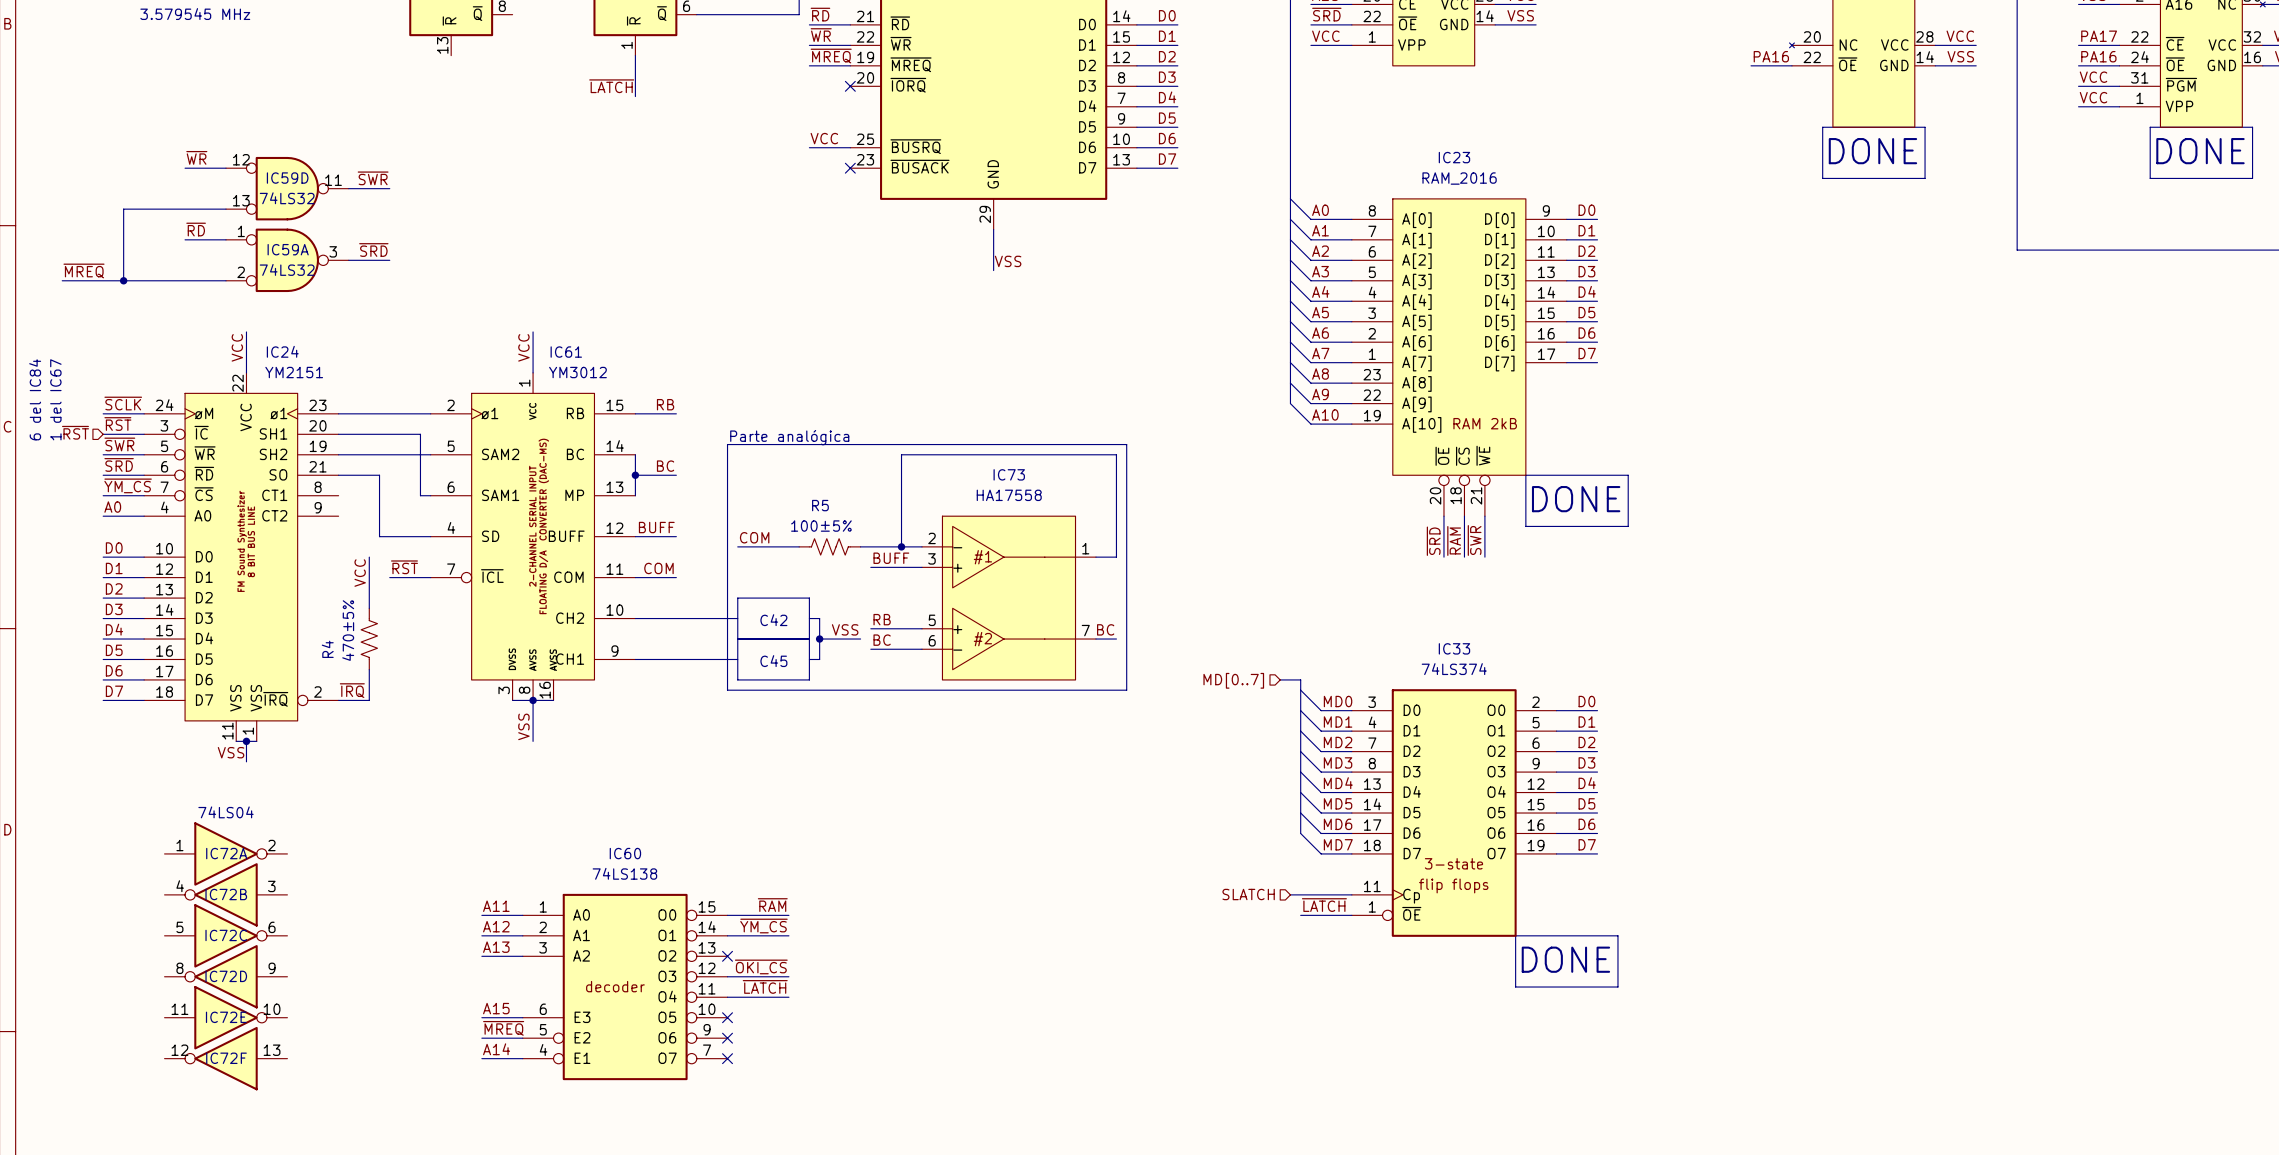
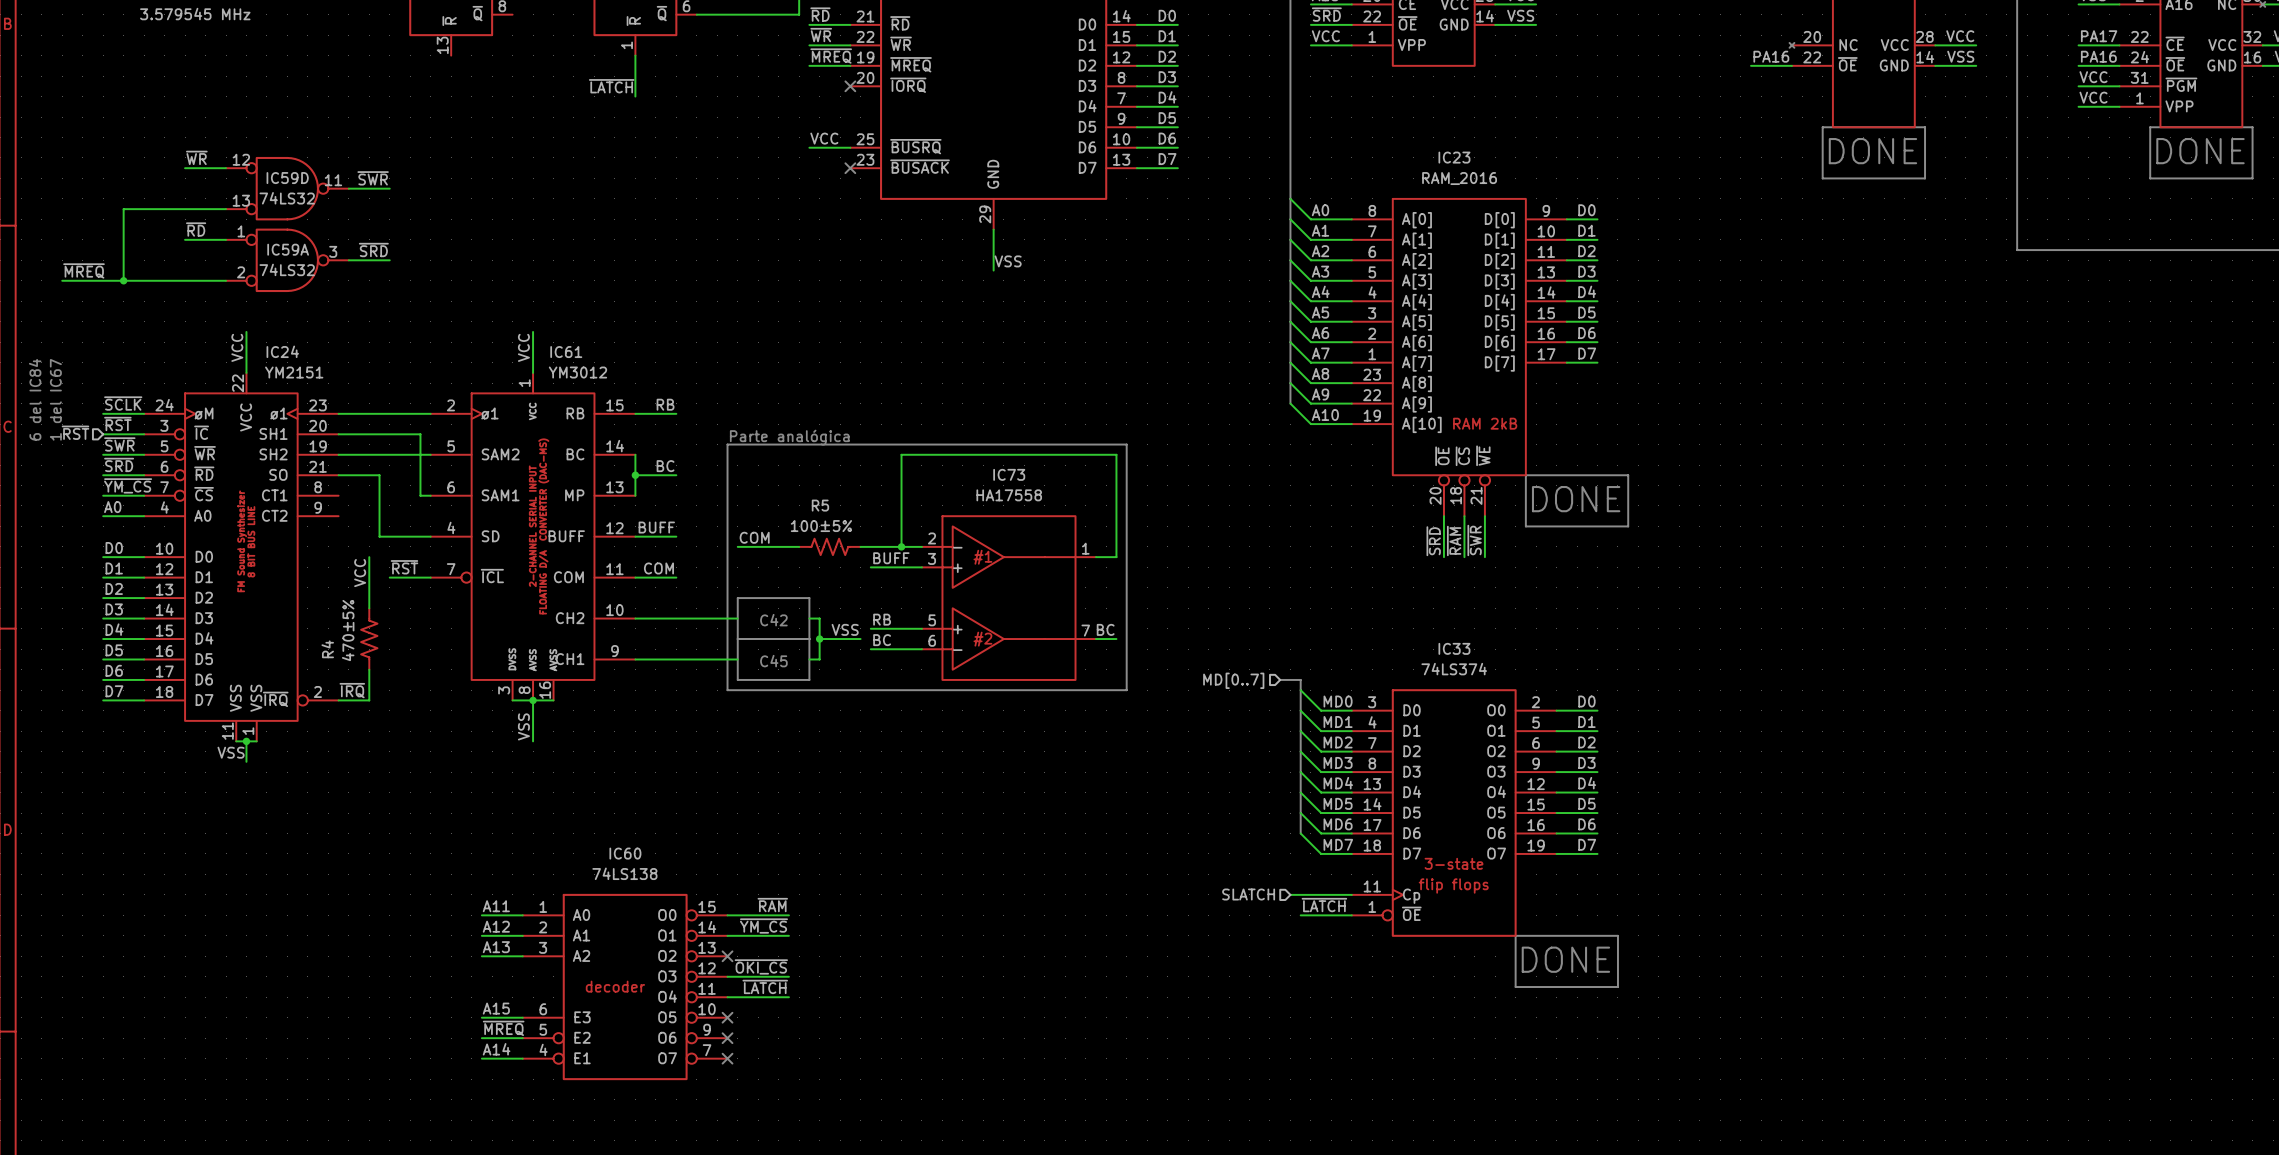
IC72A: 74LS04 (226, 853) -> none
IC72B: (226, 894) -> none
IC72C: (226, 935) -> none
IC72D: (226, 976) -> none
IC72E: (226, 1017) -> none
IC72F: (226, 1058) -> none

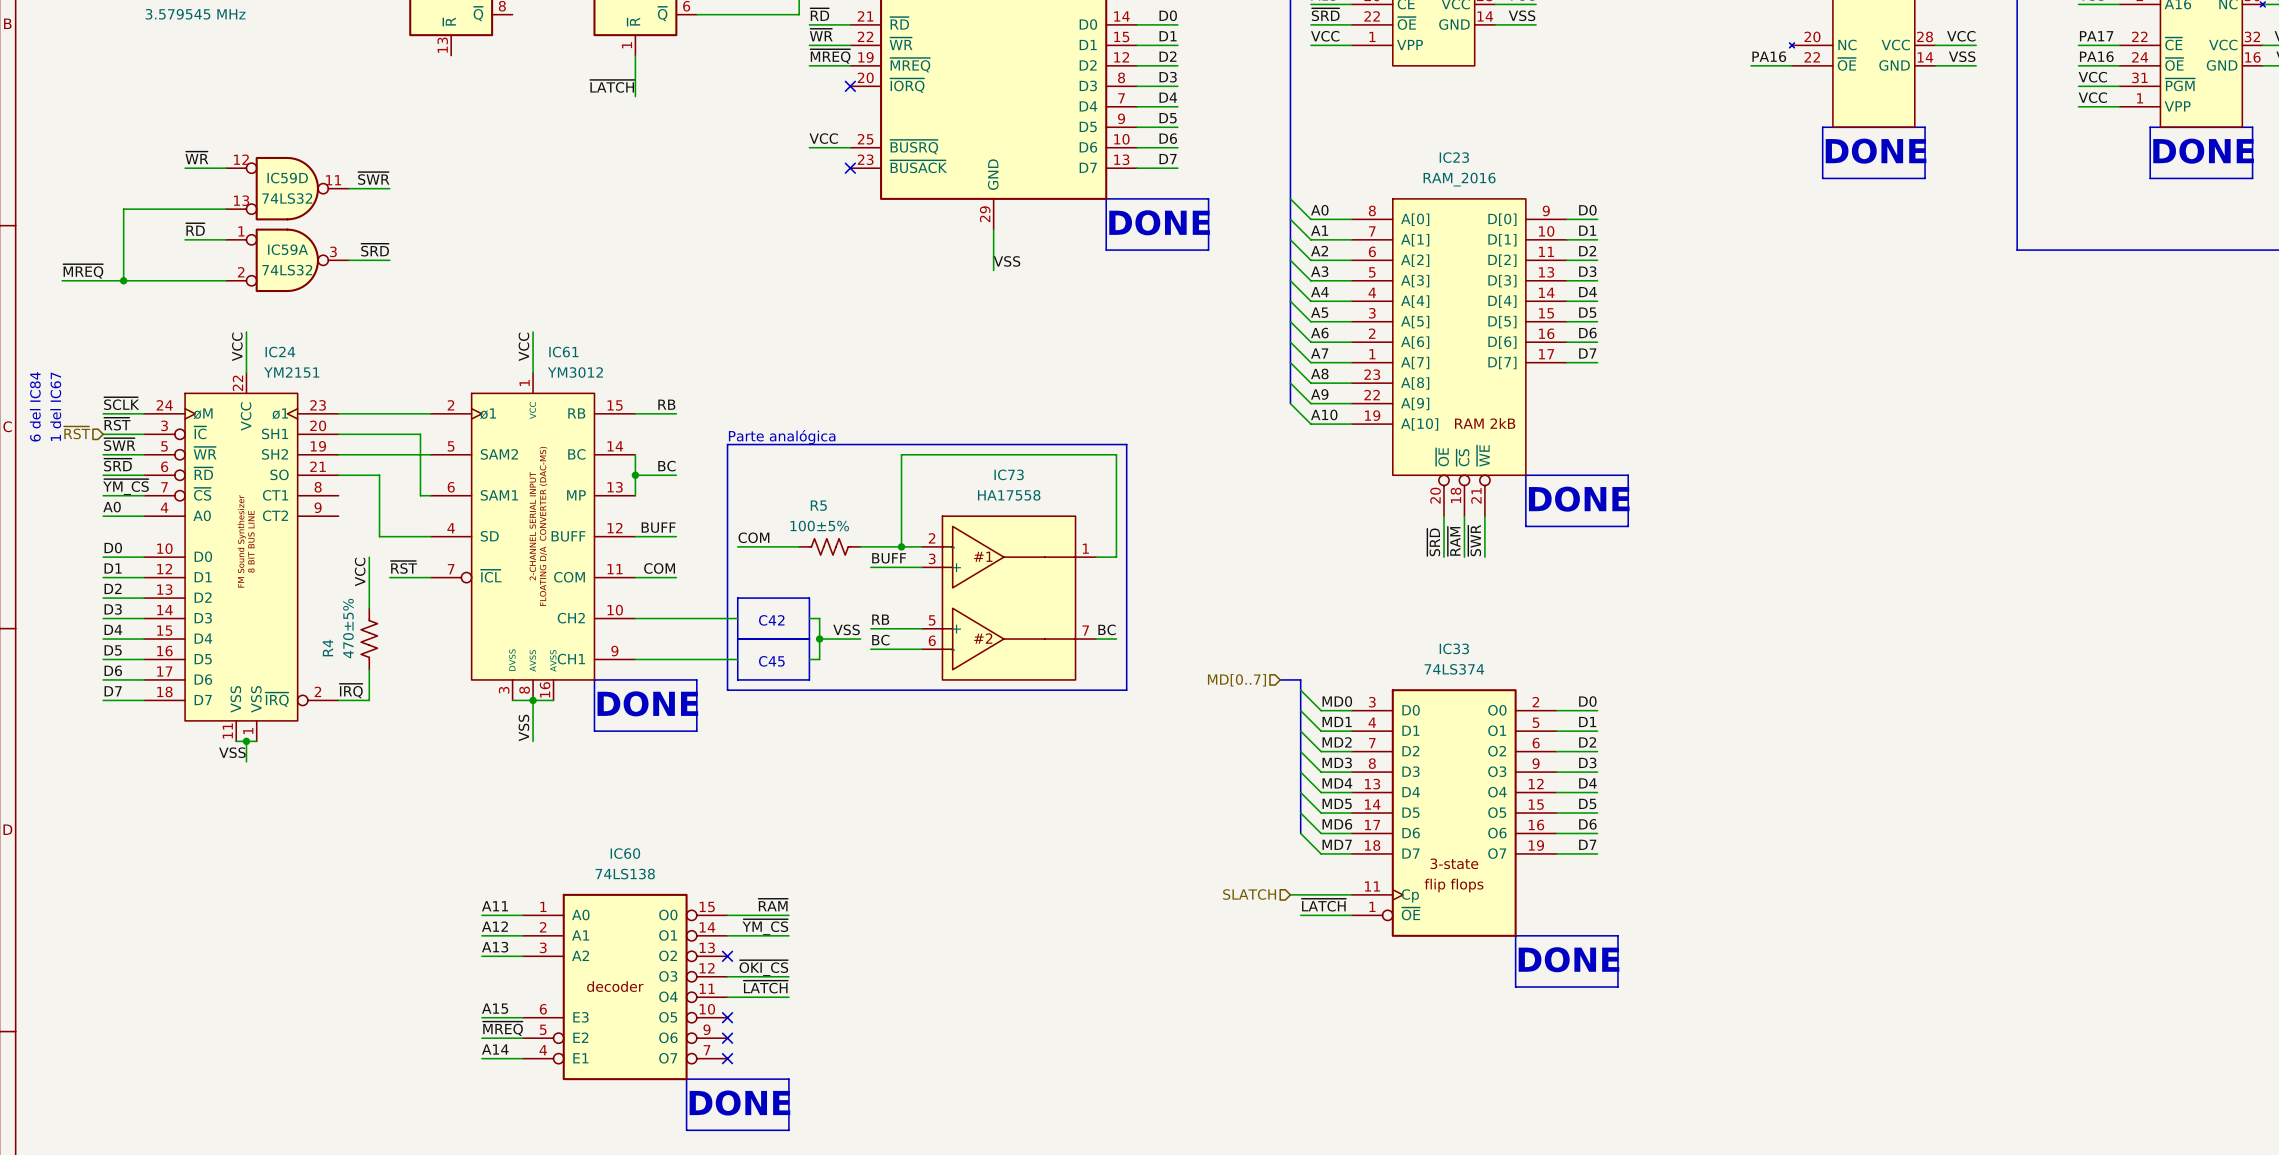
line: none -> (1106, 198) (1208, 198) (1208, 250) (1106, 250) (1106, 198)
text: none -> DONE (1159, 222)
line: none -> (594, 679) (696, 679) (696, 731) (594, 731) (594, 679)
text: none -> DONE (647, 703)
line: none -> (686, 1079) (788, 1079) (788, 1130) (686, 1130) (686, 1079)
text: none -> DONE (739, 1103)

